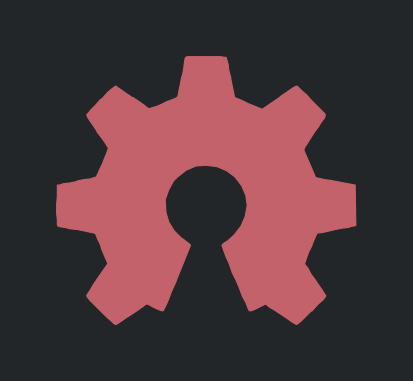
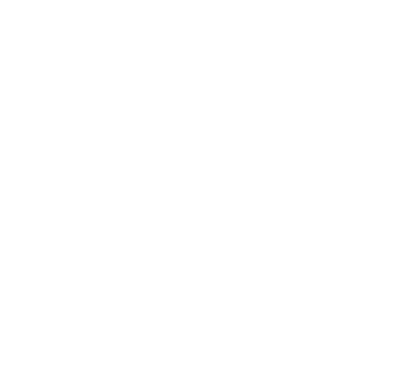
part: (206, 190) -> none

